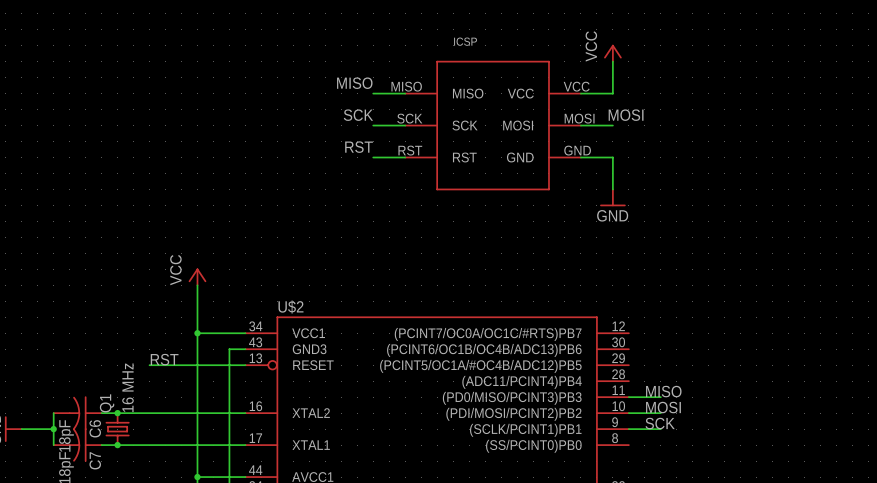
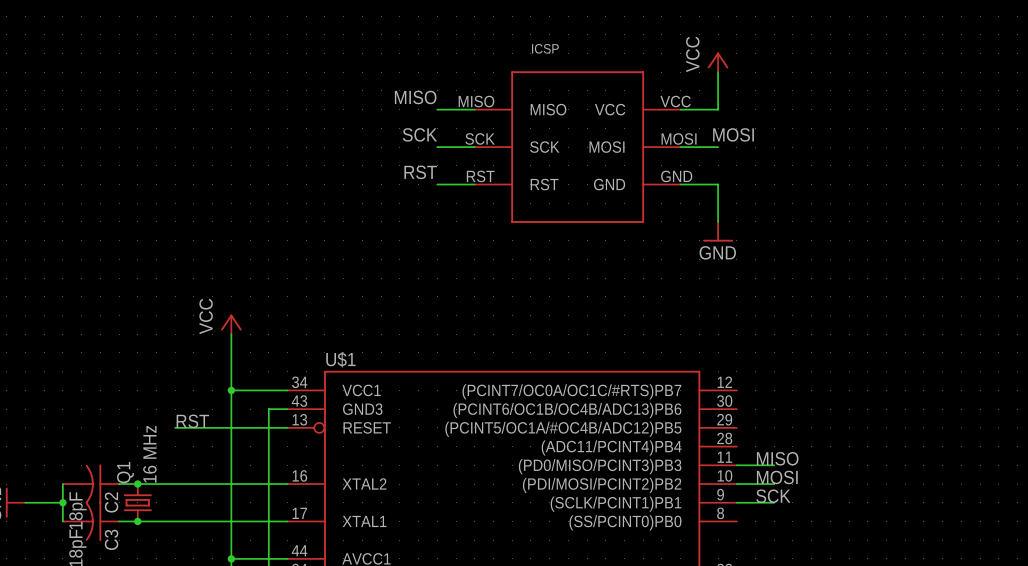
U$2 name: U$2 (290, 307) -> U$1 (340, 359)
C6 name: C6 (95, 428) -> C2 (111, 502)
C7 name: C7 (95, 460) -> C3 (111, 539)

